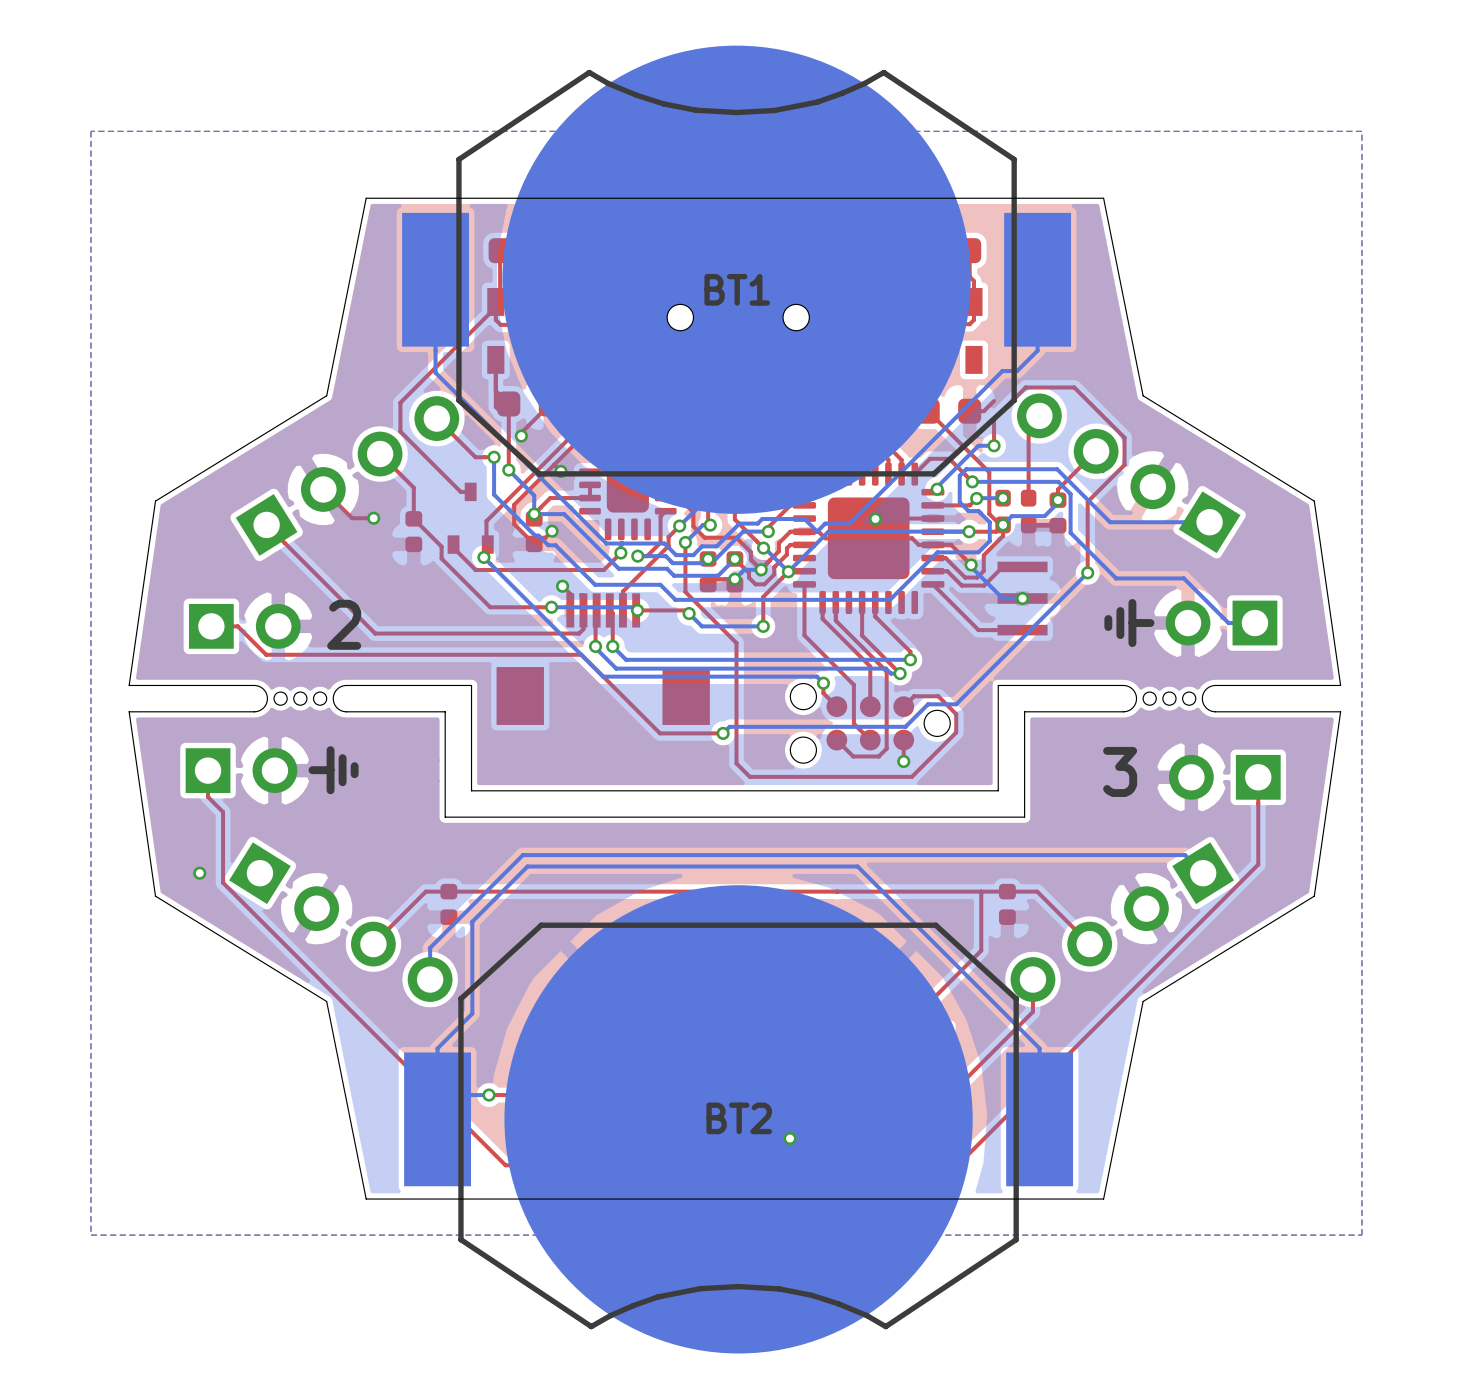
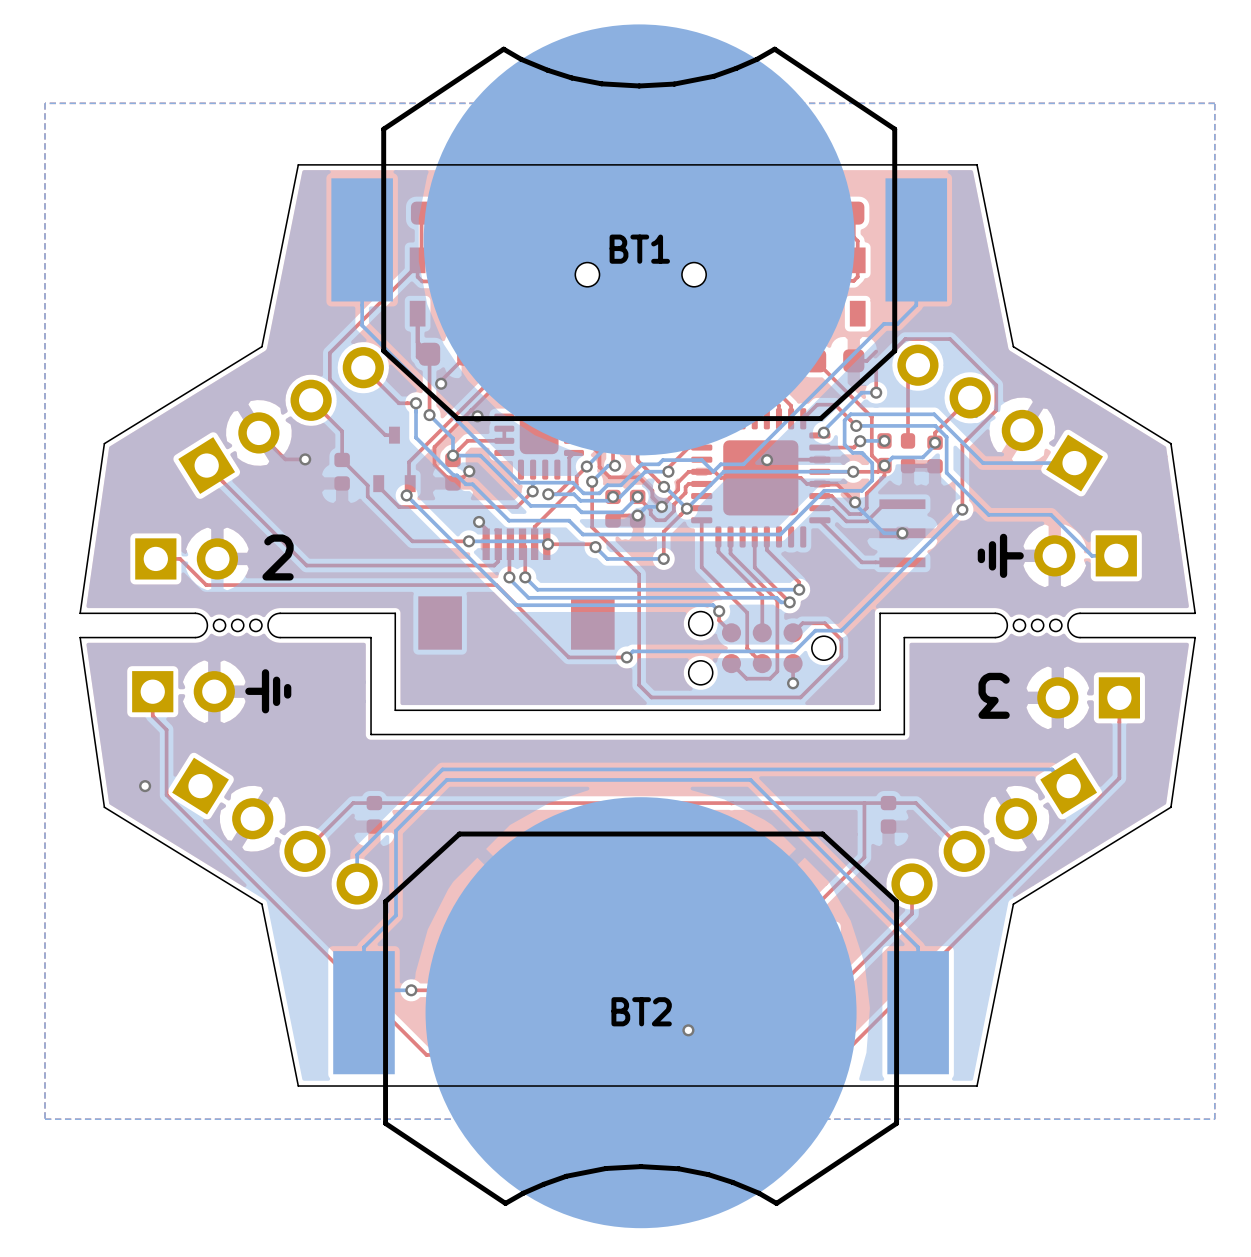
text rotation: 0° (1120, 771) -> 180° (994, 695)

